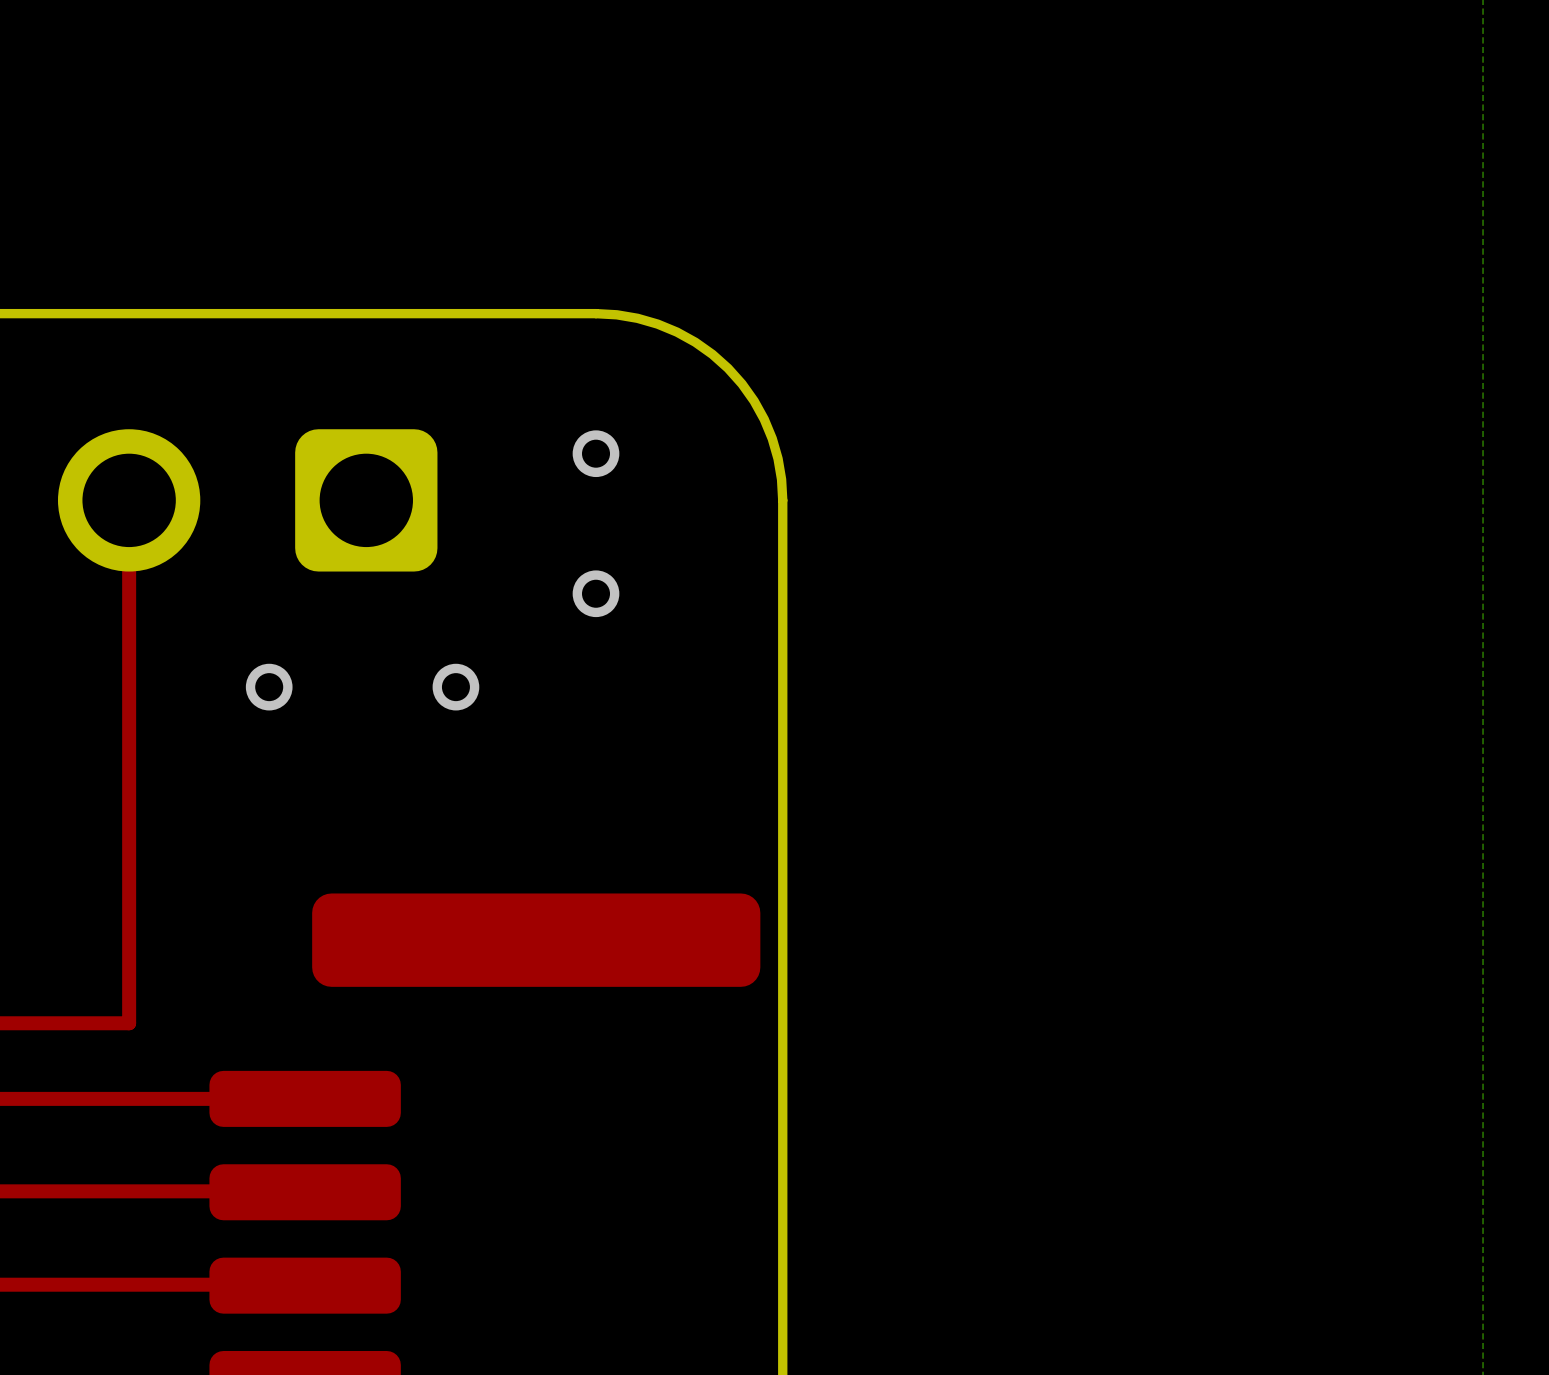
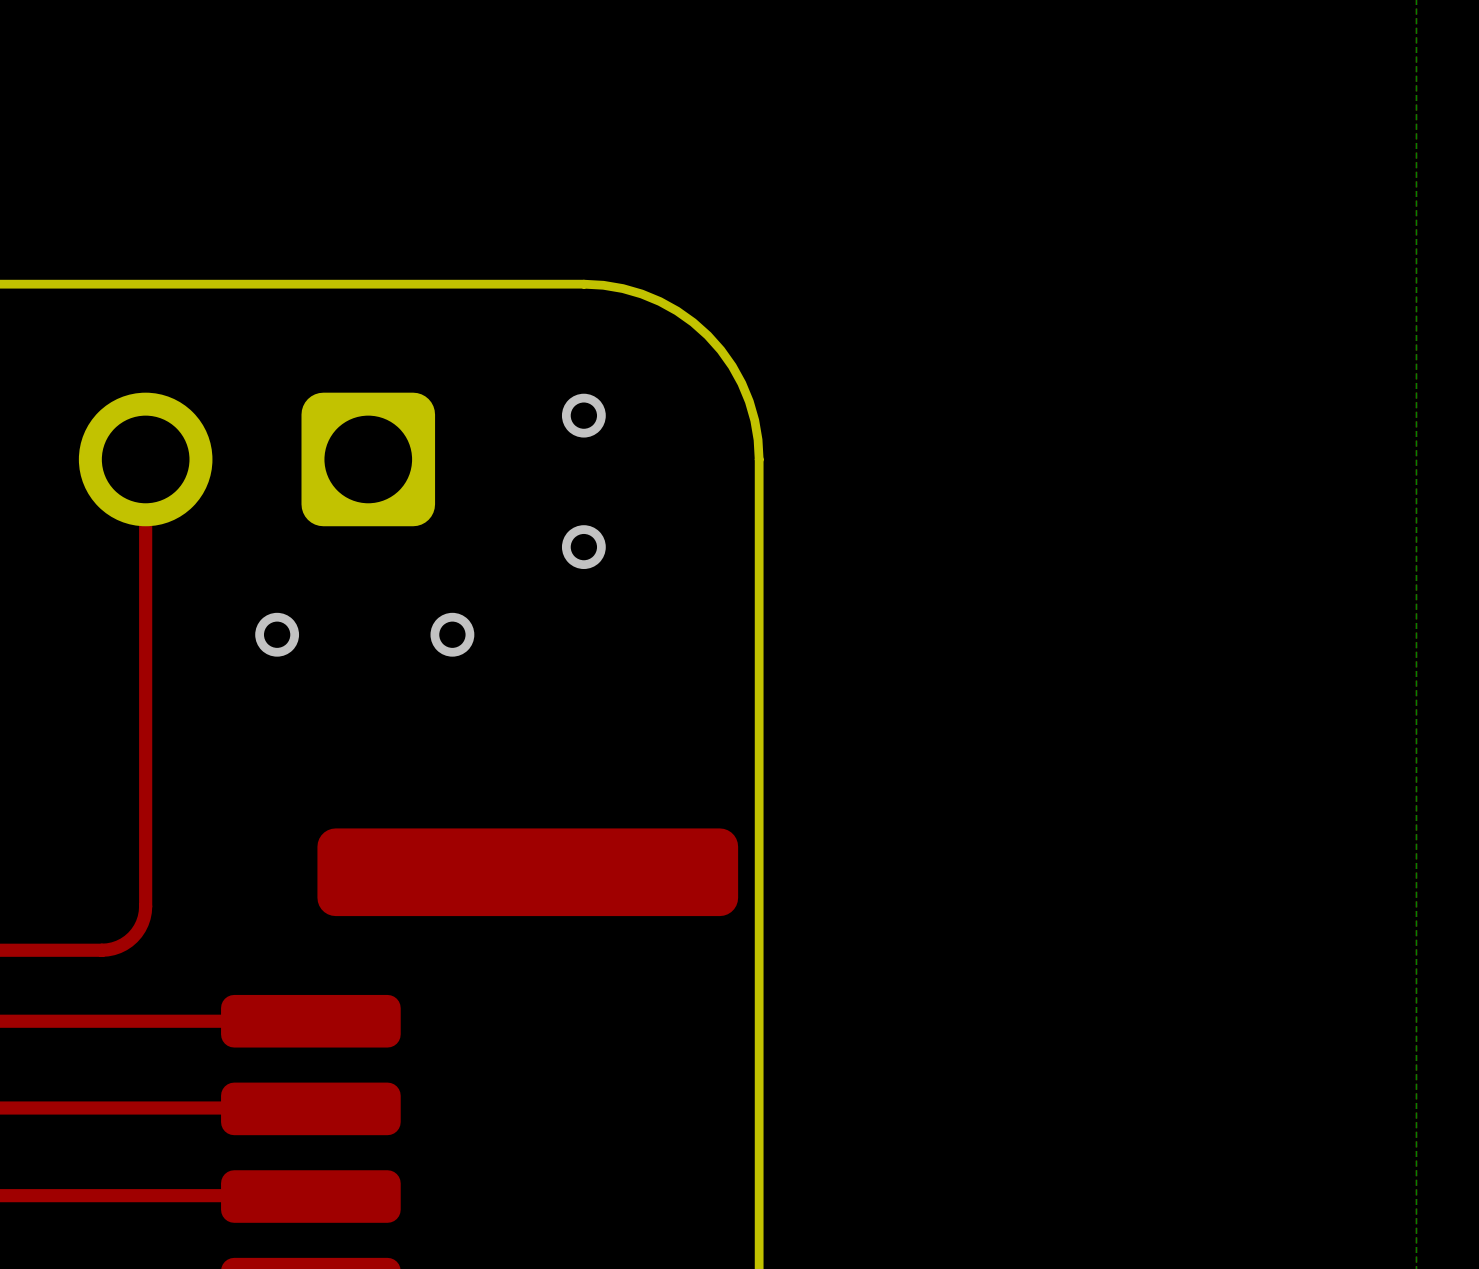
top track: (129, 976) (129, 1023) (82, 1023) -> (145, 906) (142, 923) (132, 937) (118, 946) (101, 950)

